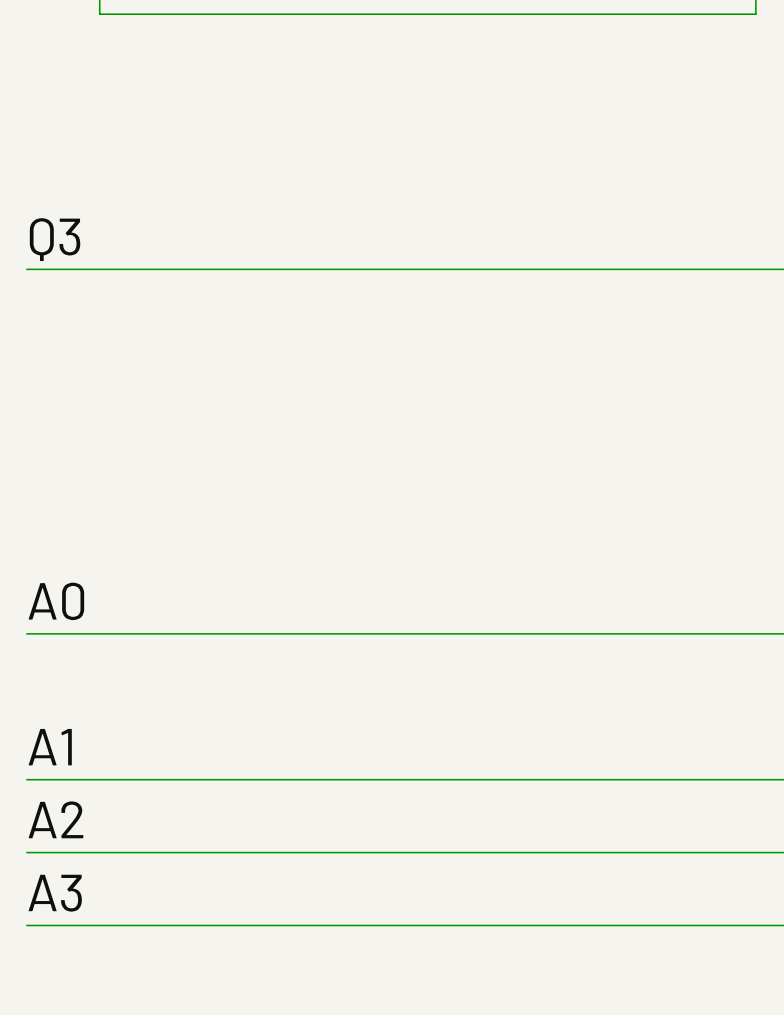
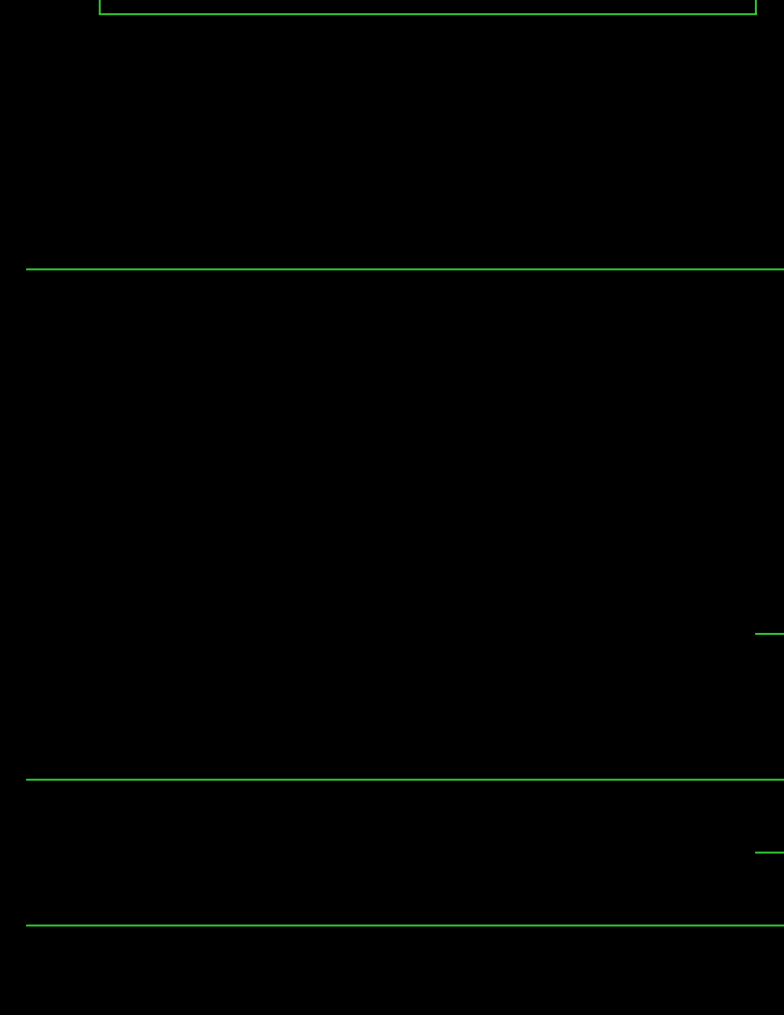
label: Q3 (55, 239) -> none
label: A0 (56, 601) -> none
wire: (26, 633) (755, 633) -> none
label: A1 (50, 747) -> none
label: A2 (55, 819) -> none
wire: (26, 852) (755, 852) -> none
label: A3 (55, 893) -> none

